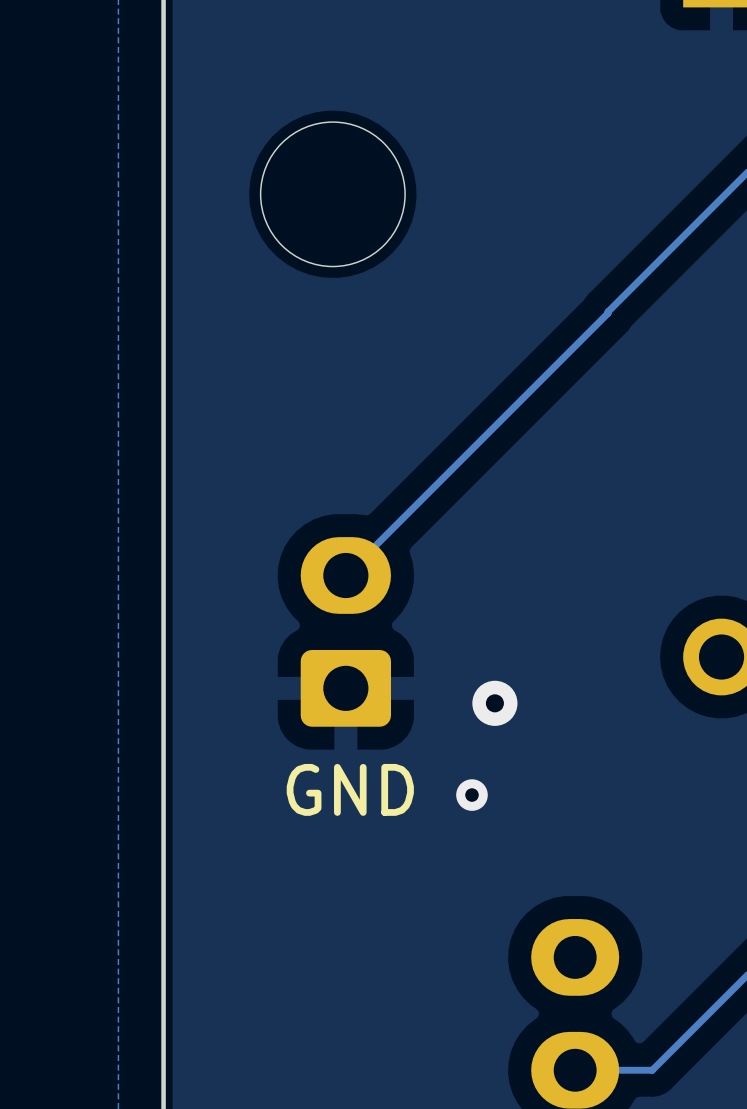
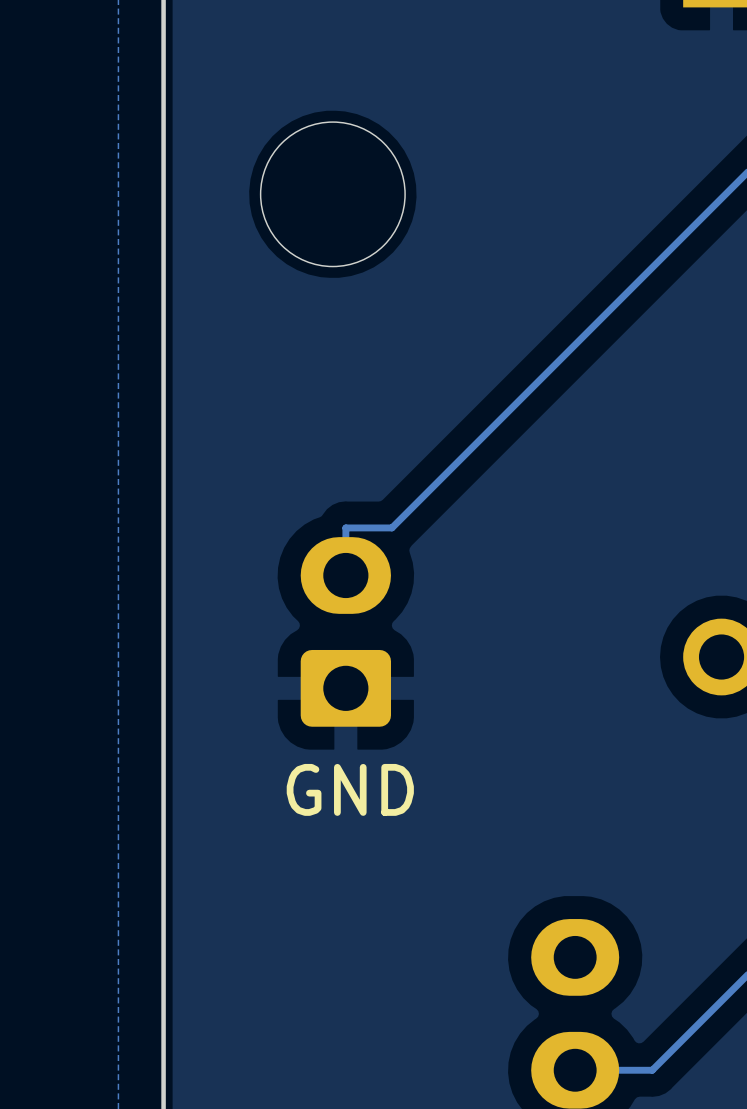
track: (608, 311) (345, 575) -> (608, 311) (391, 527) (345, 527) (345, 575)
via: (494, 703) -> none
via: (471, 795) -> none

